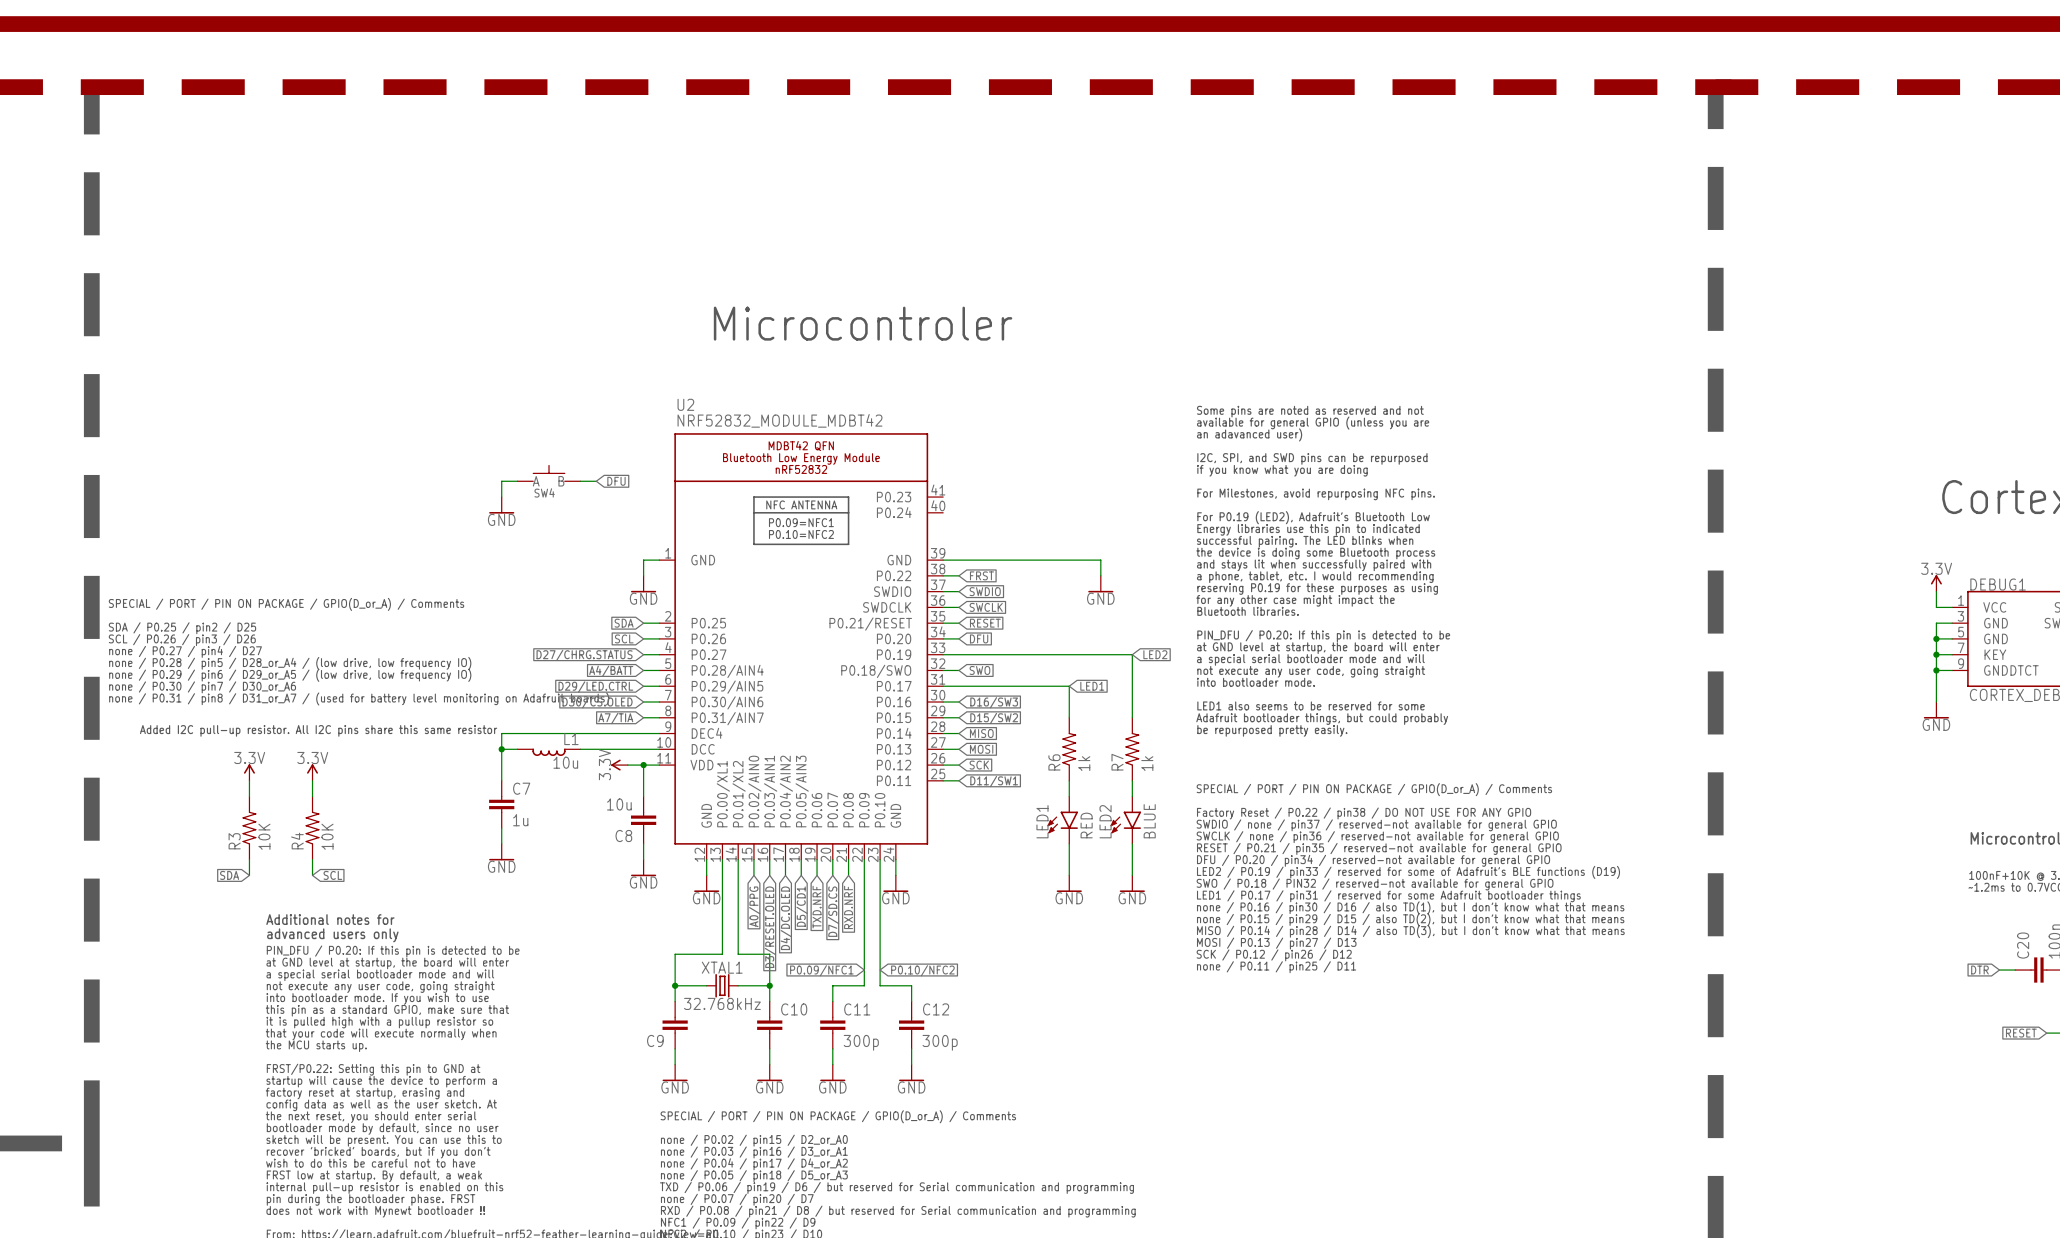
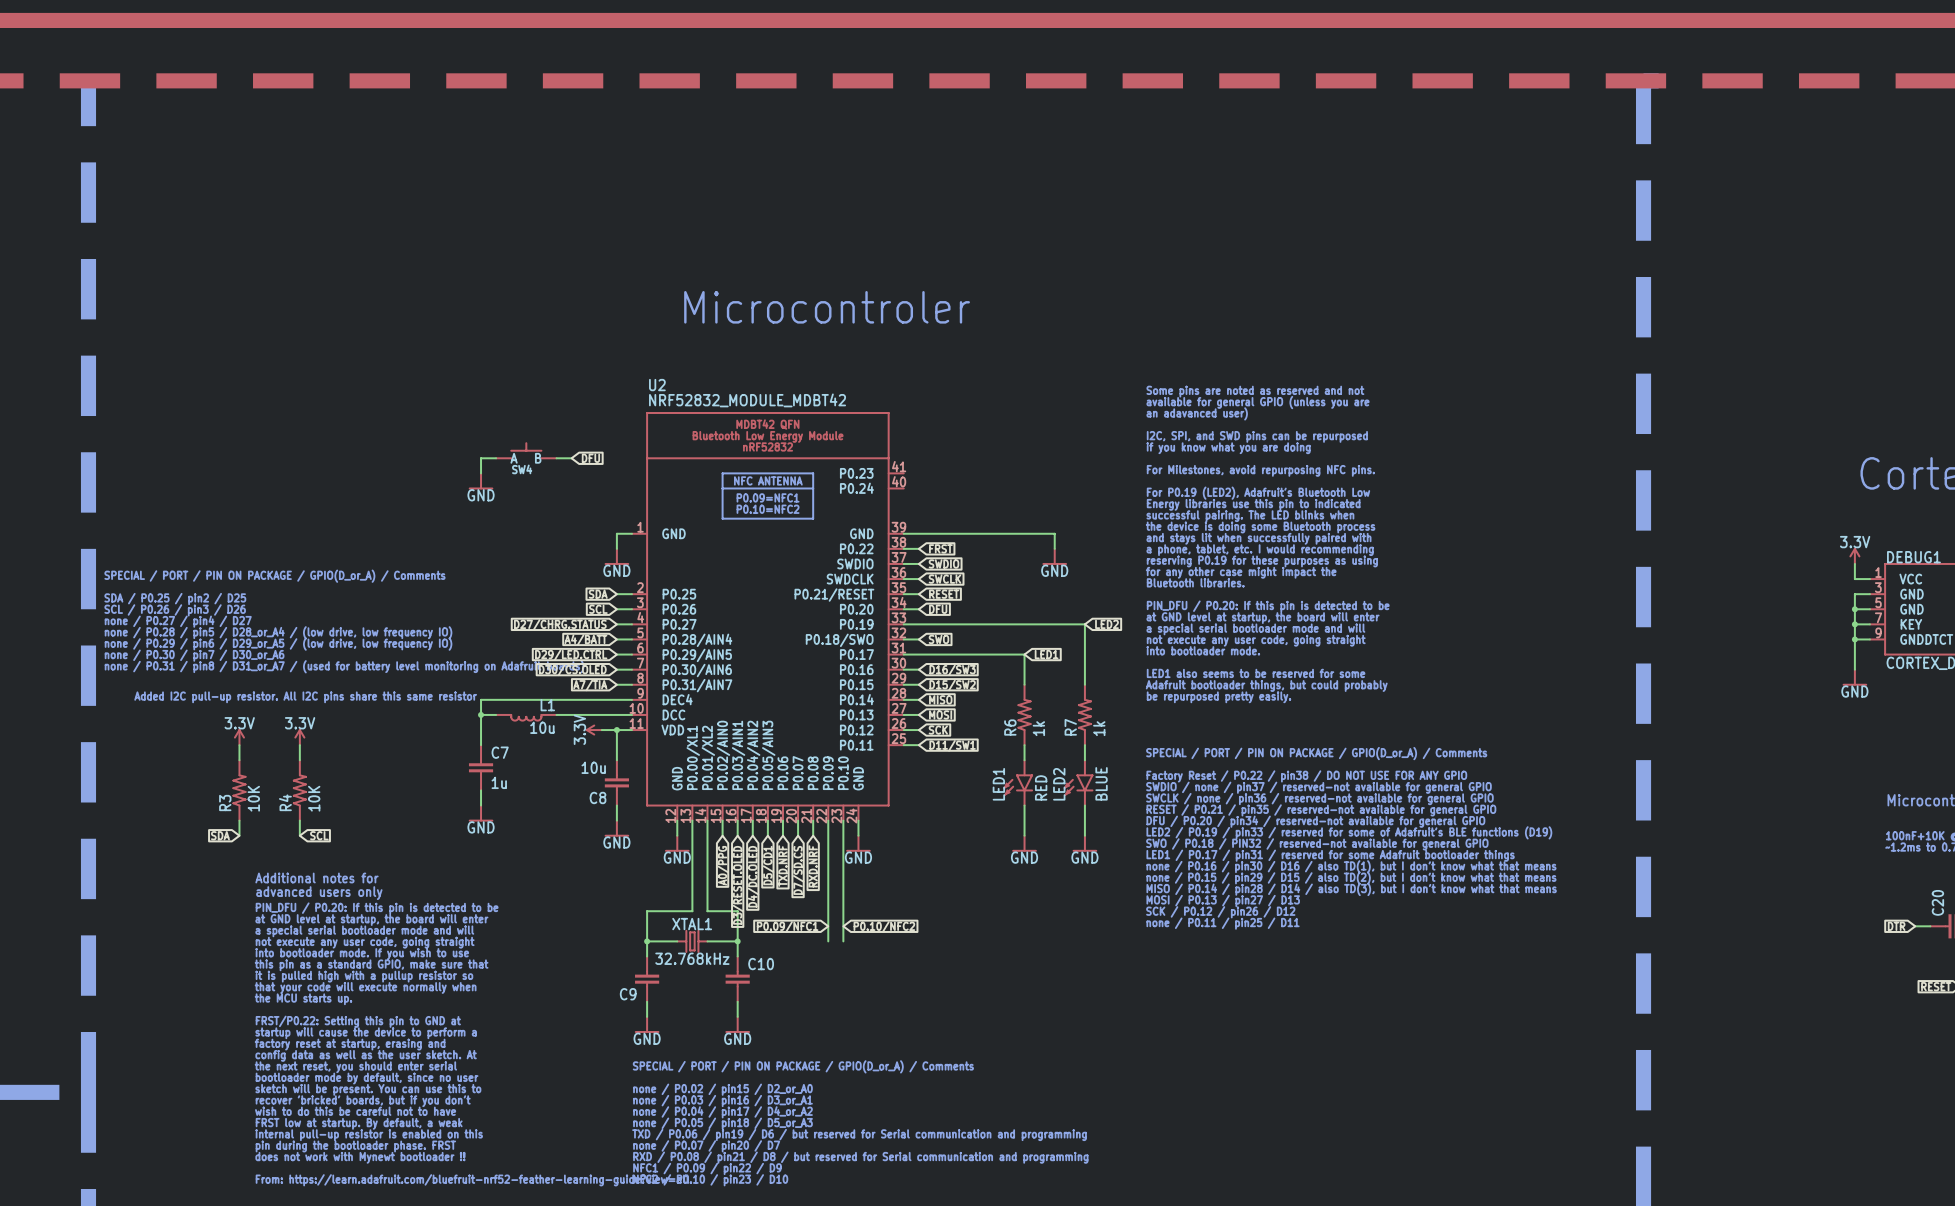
wire: (864, 985) (832, 985) (832, 1001) -> none
wire: (880, 985) (911, 985) (911, 1001) -> none
C11: 300p (832, 1025) -> none
C12: 300p (911, 1025) -> none
wire: (832, 1048) (832, 1064) -> none
wire: (911, 1048) (911, 1064) -> none
power symbol: GND (832, 1072) -> none
power symbol: GND (911, 1072) -> none

